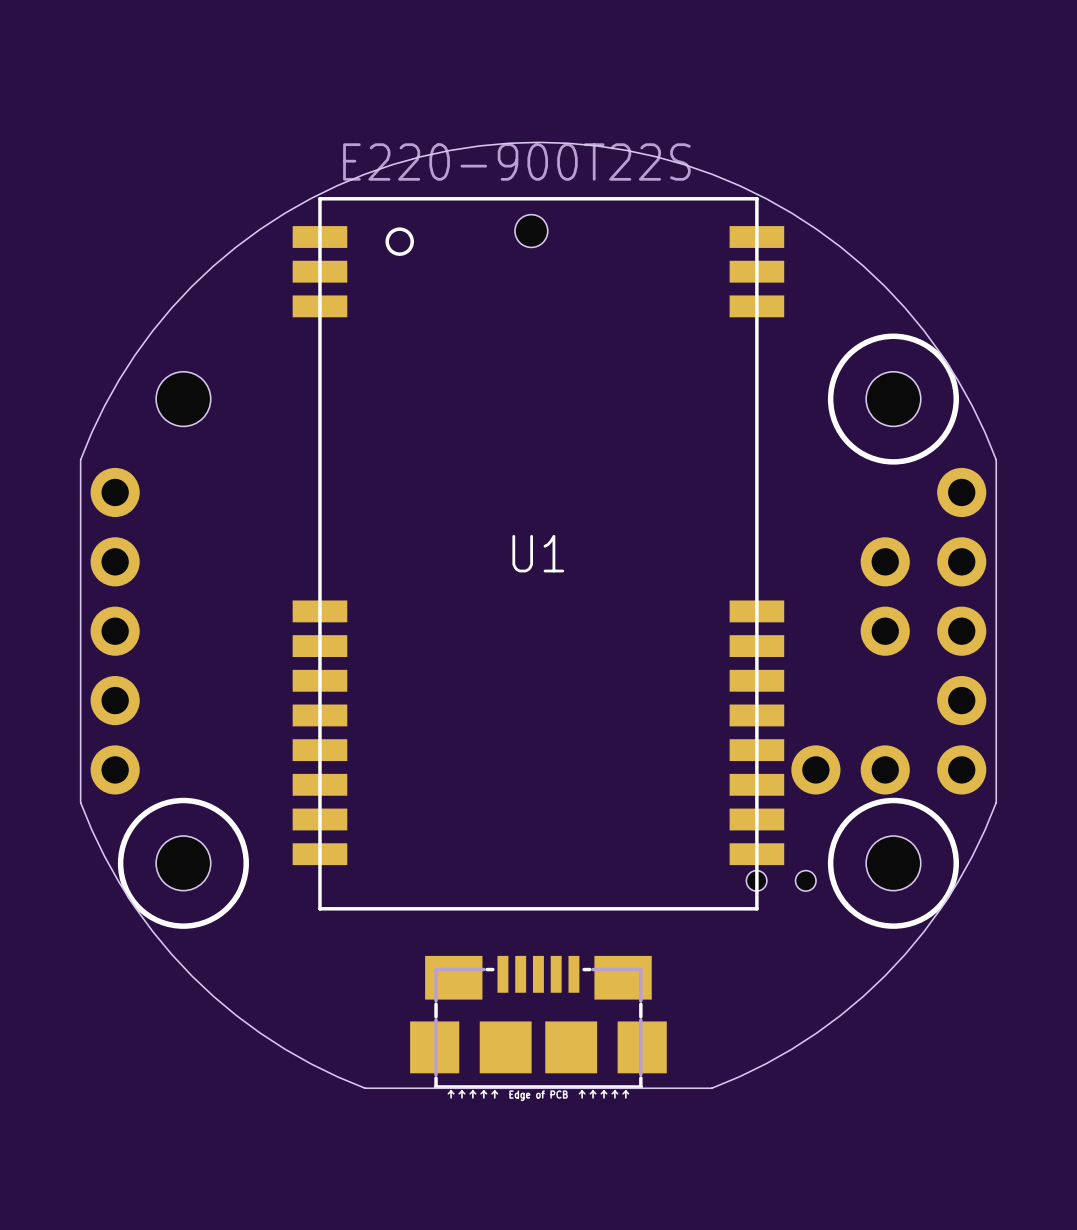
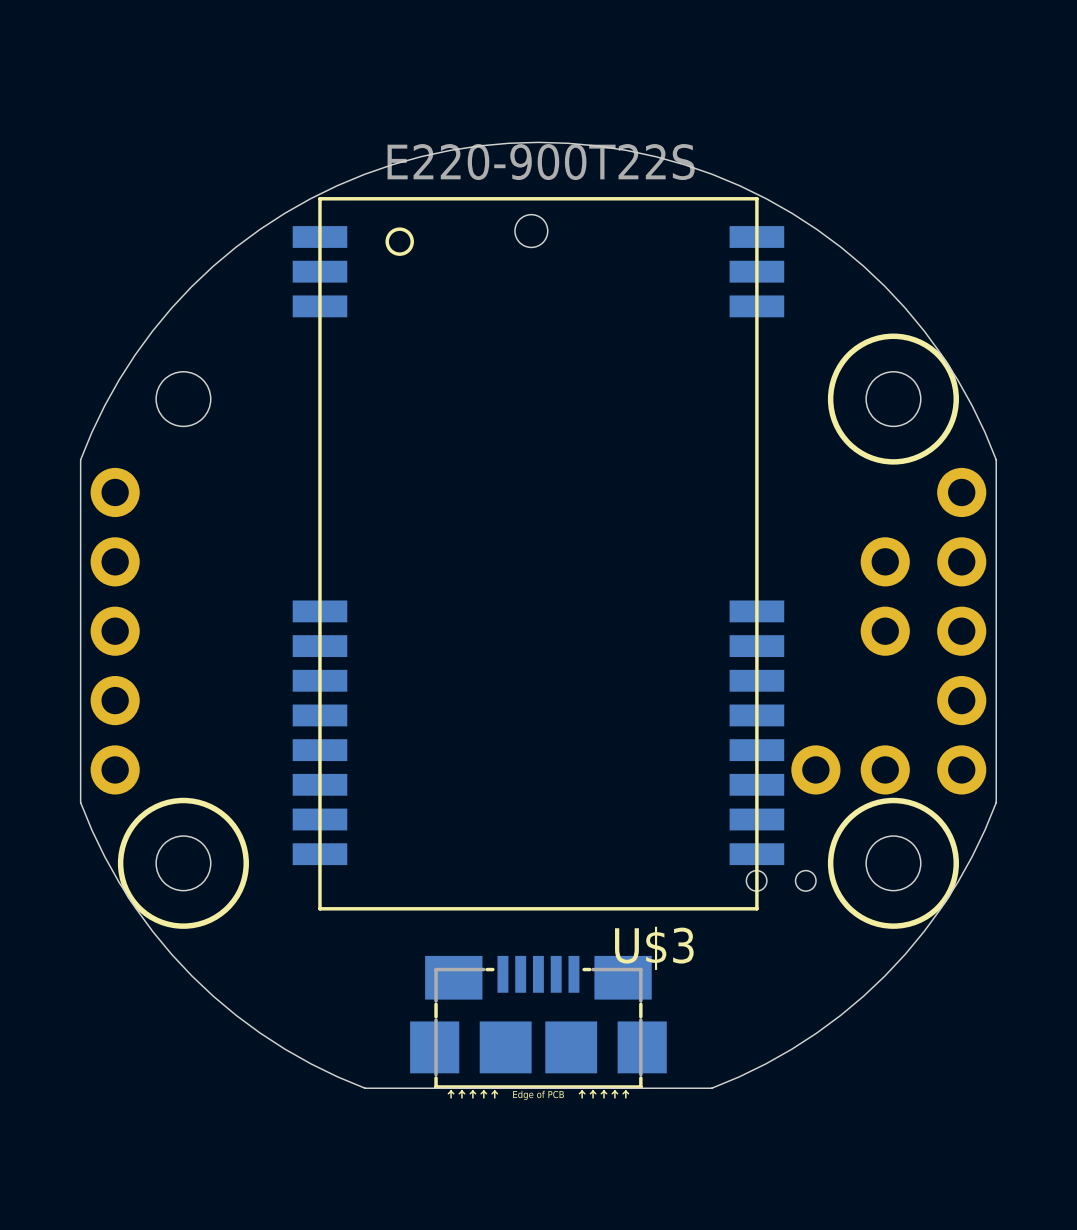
U1 name: U1 (538, 553) -> U$3 (654, 948)

